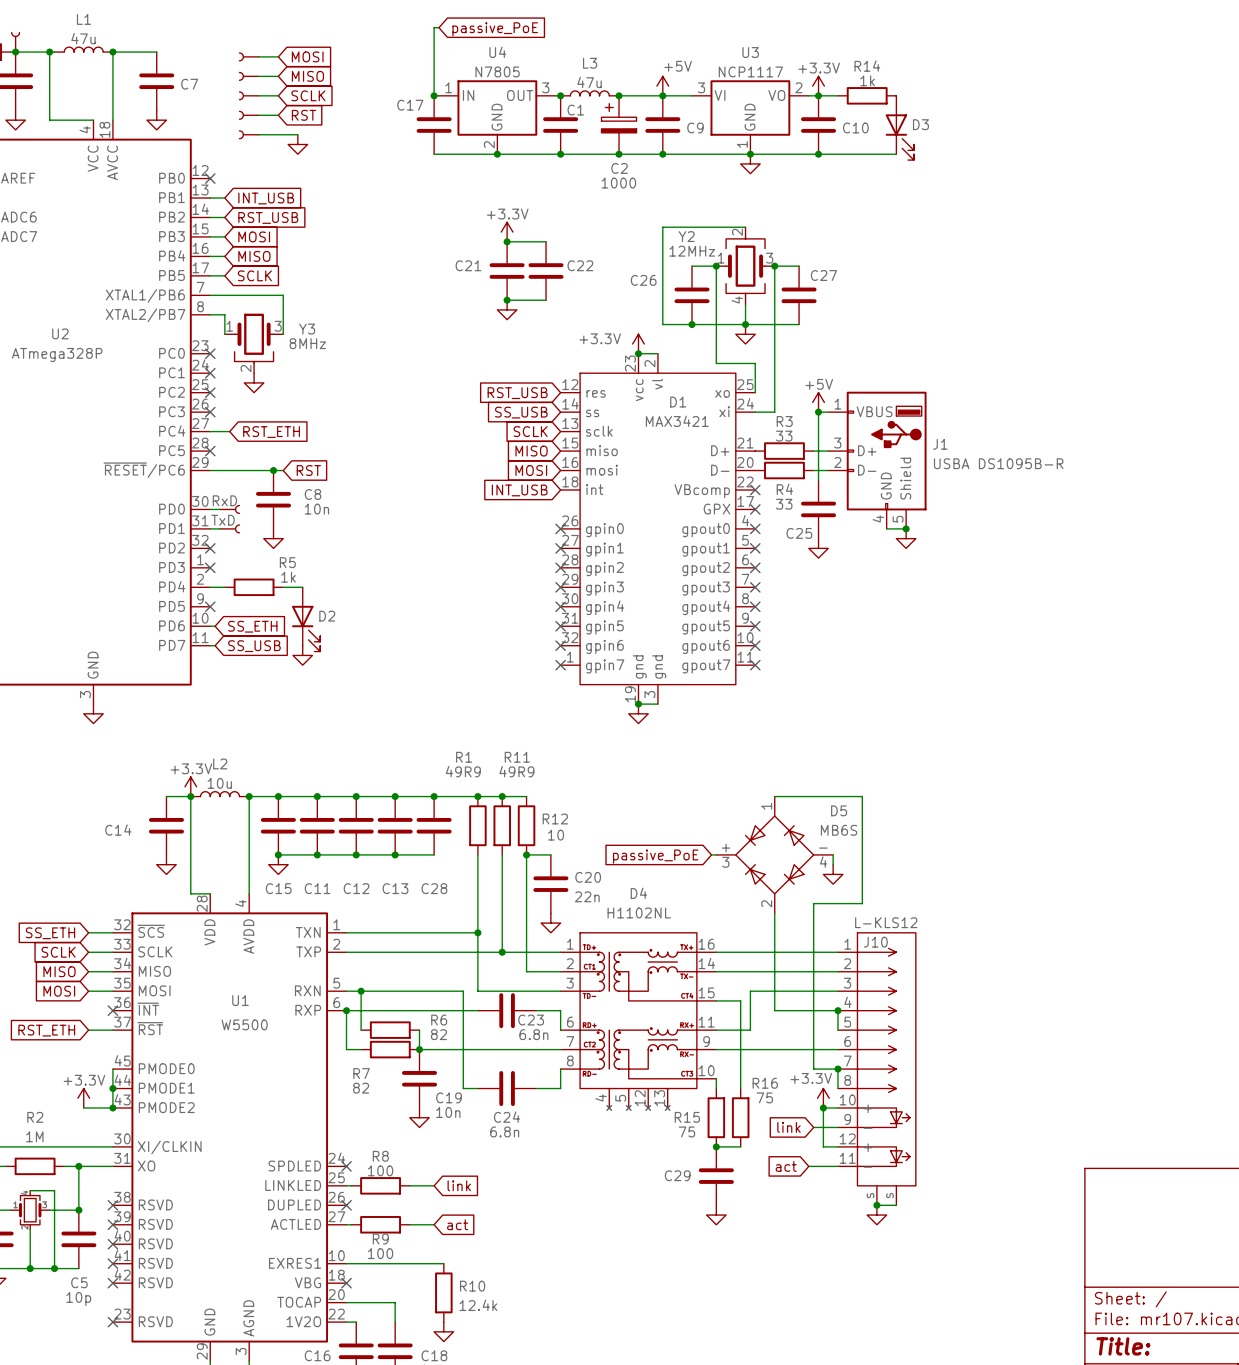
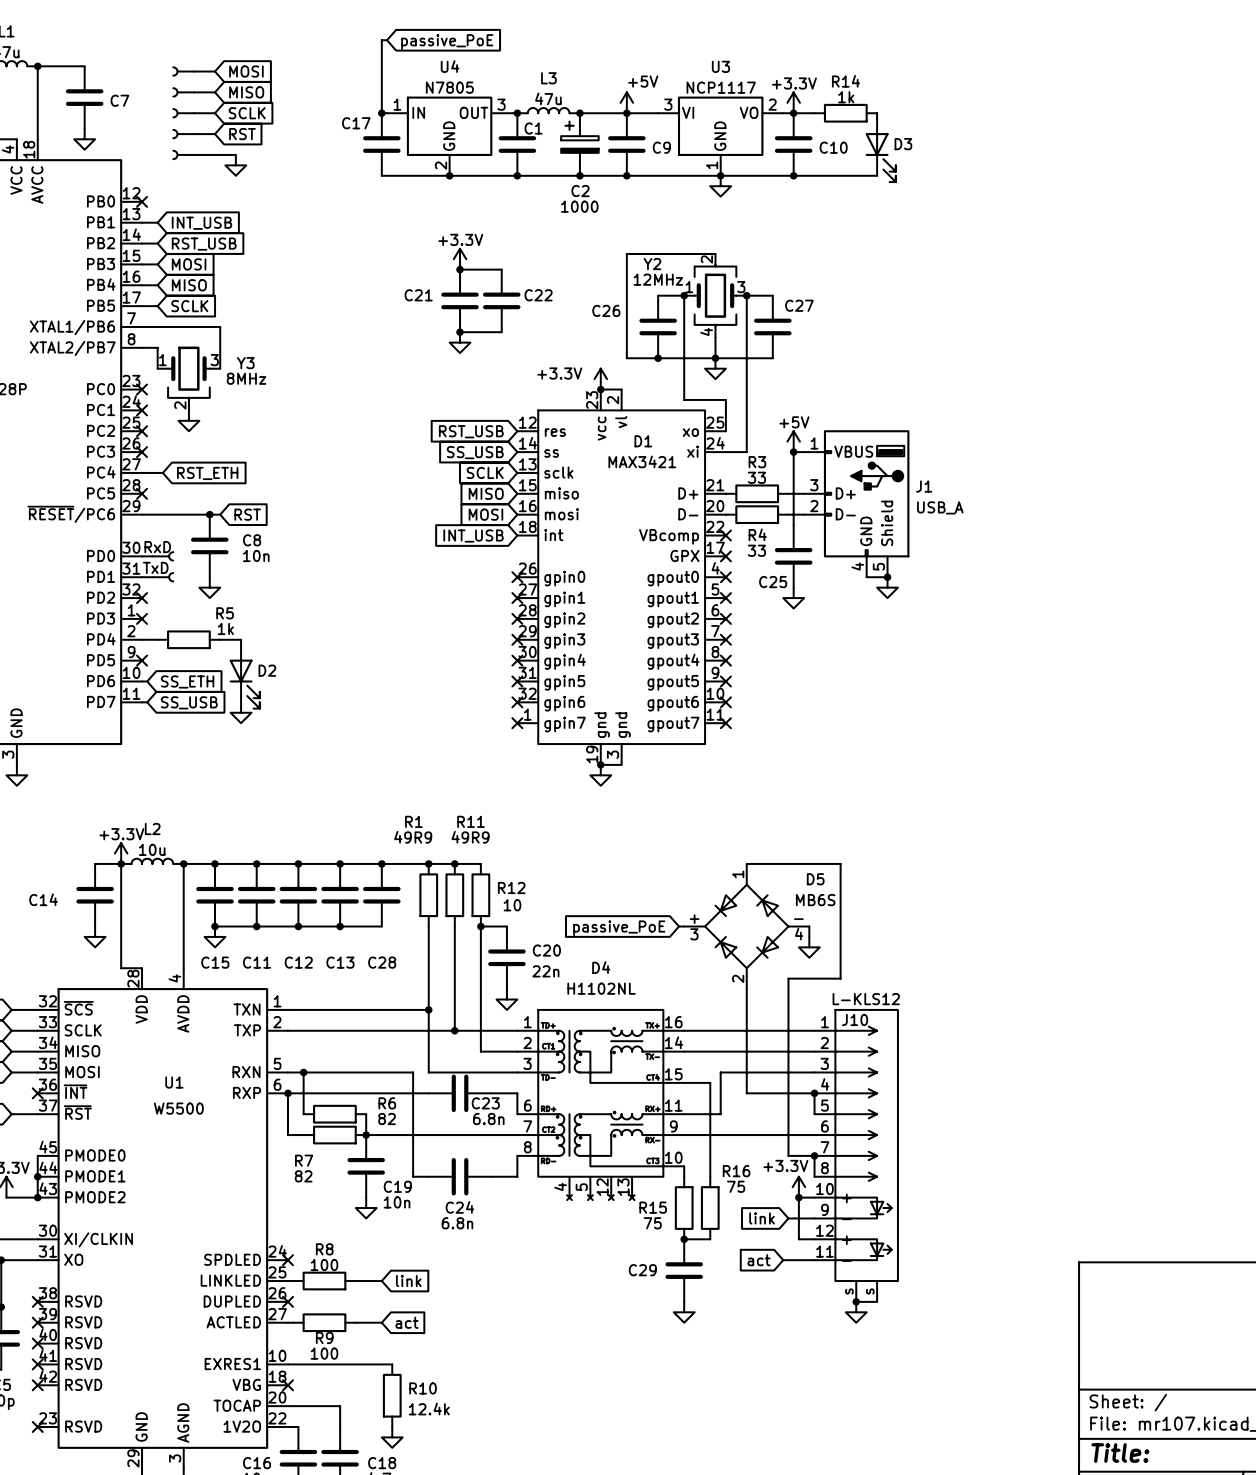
J1 value: USBA DS1095B-R (998, 463) -> USB_A (940, 507)

